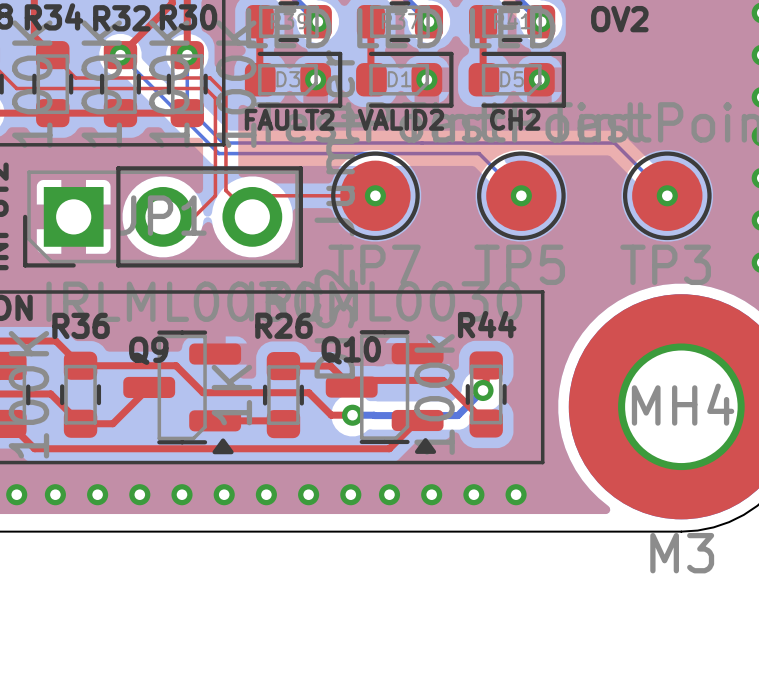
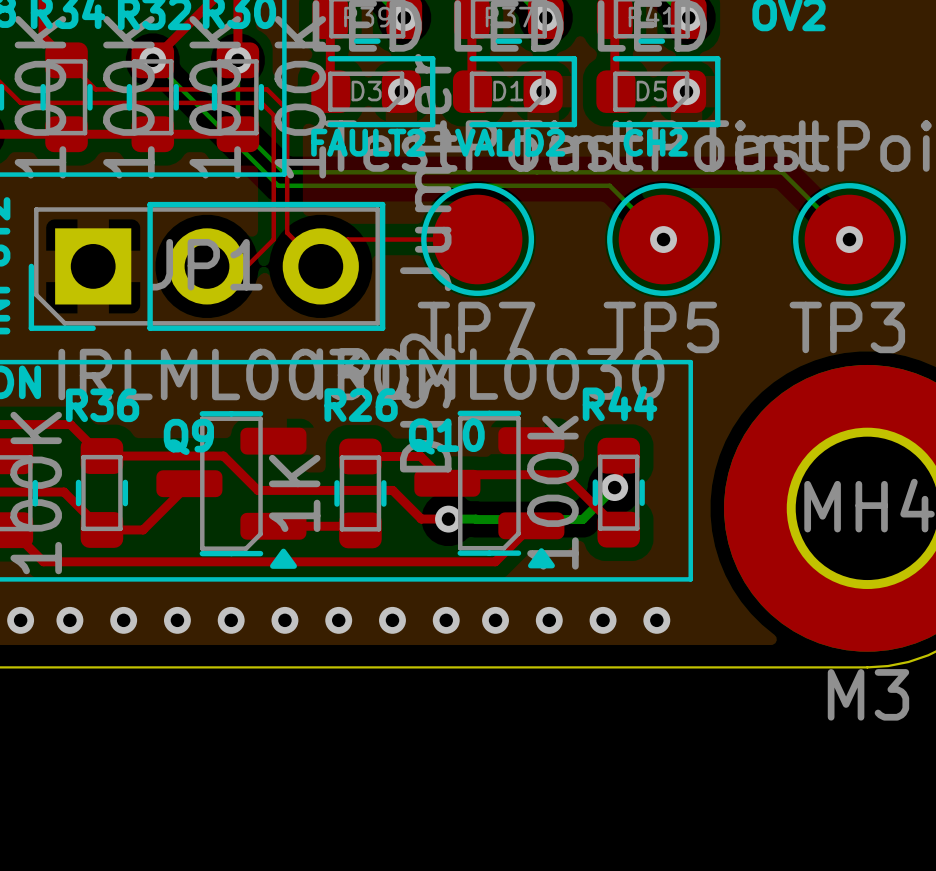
via: (375, 195) -> none

